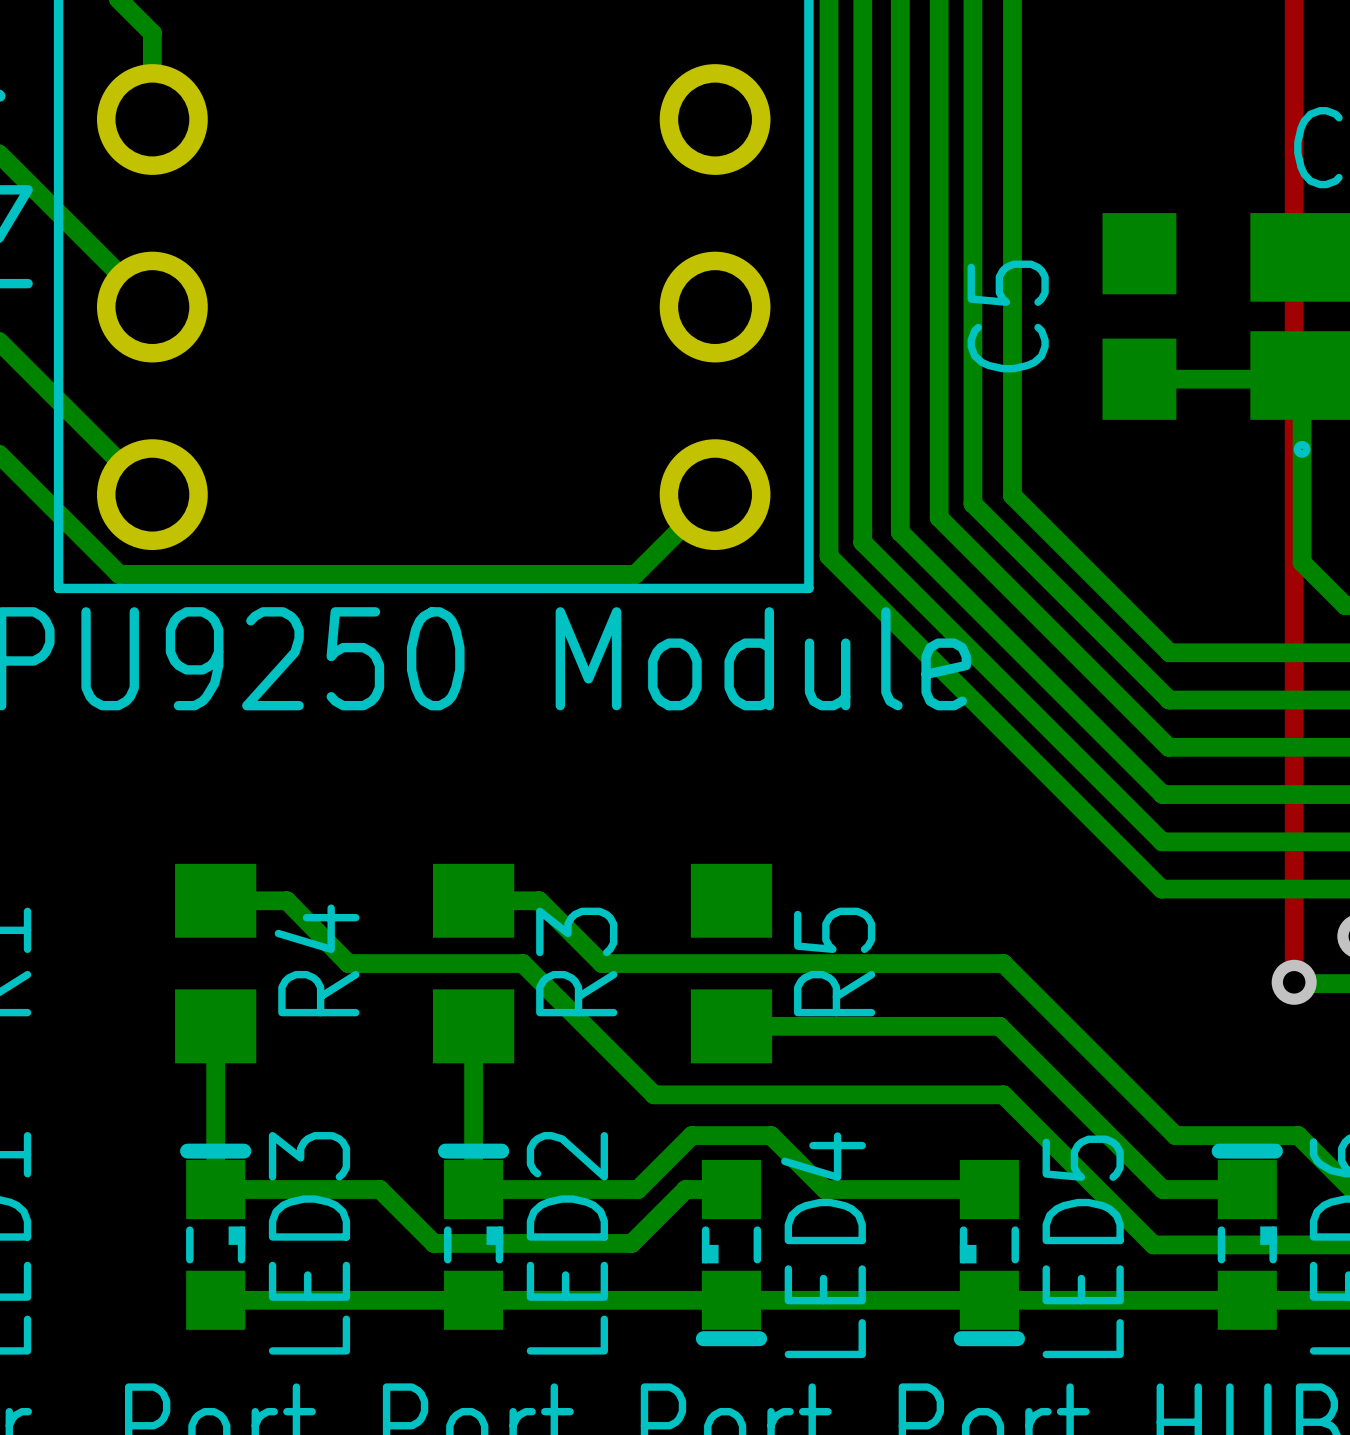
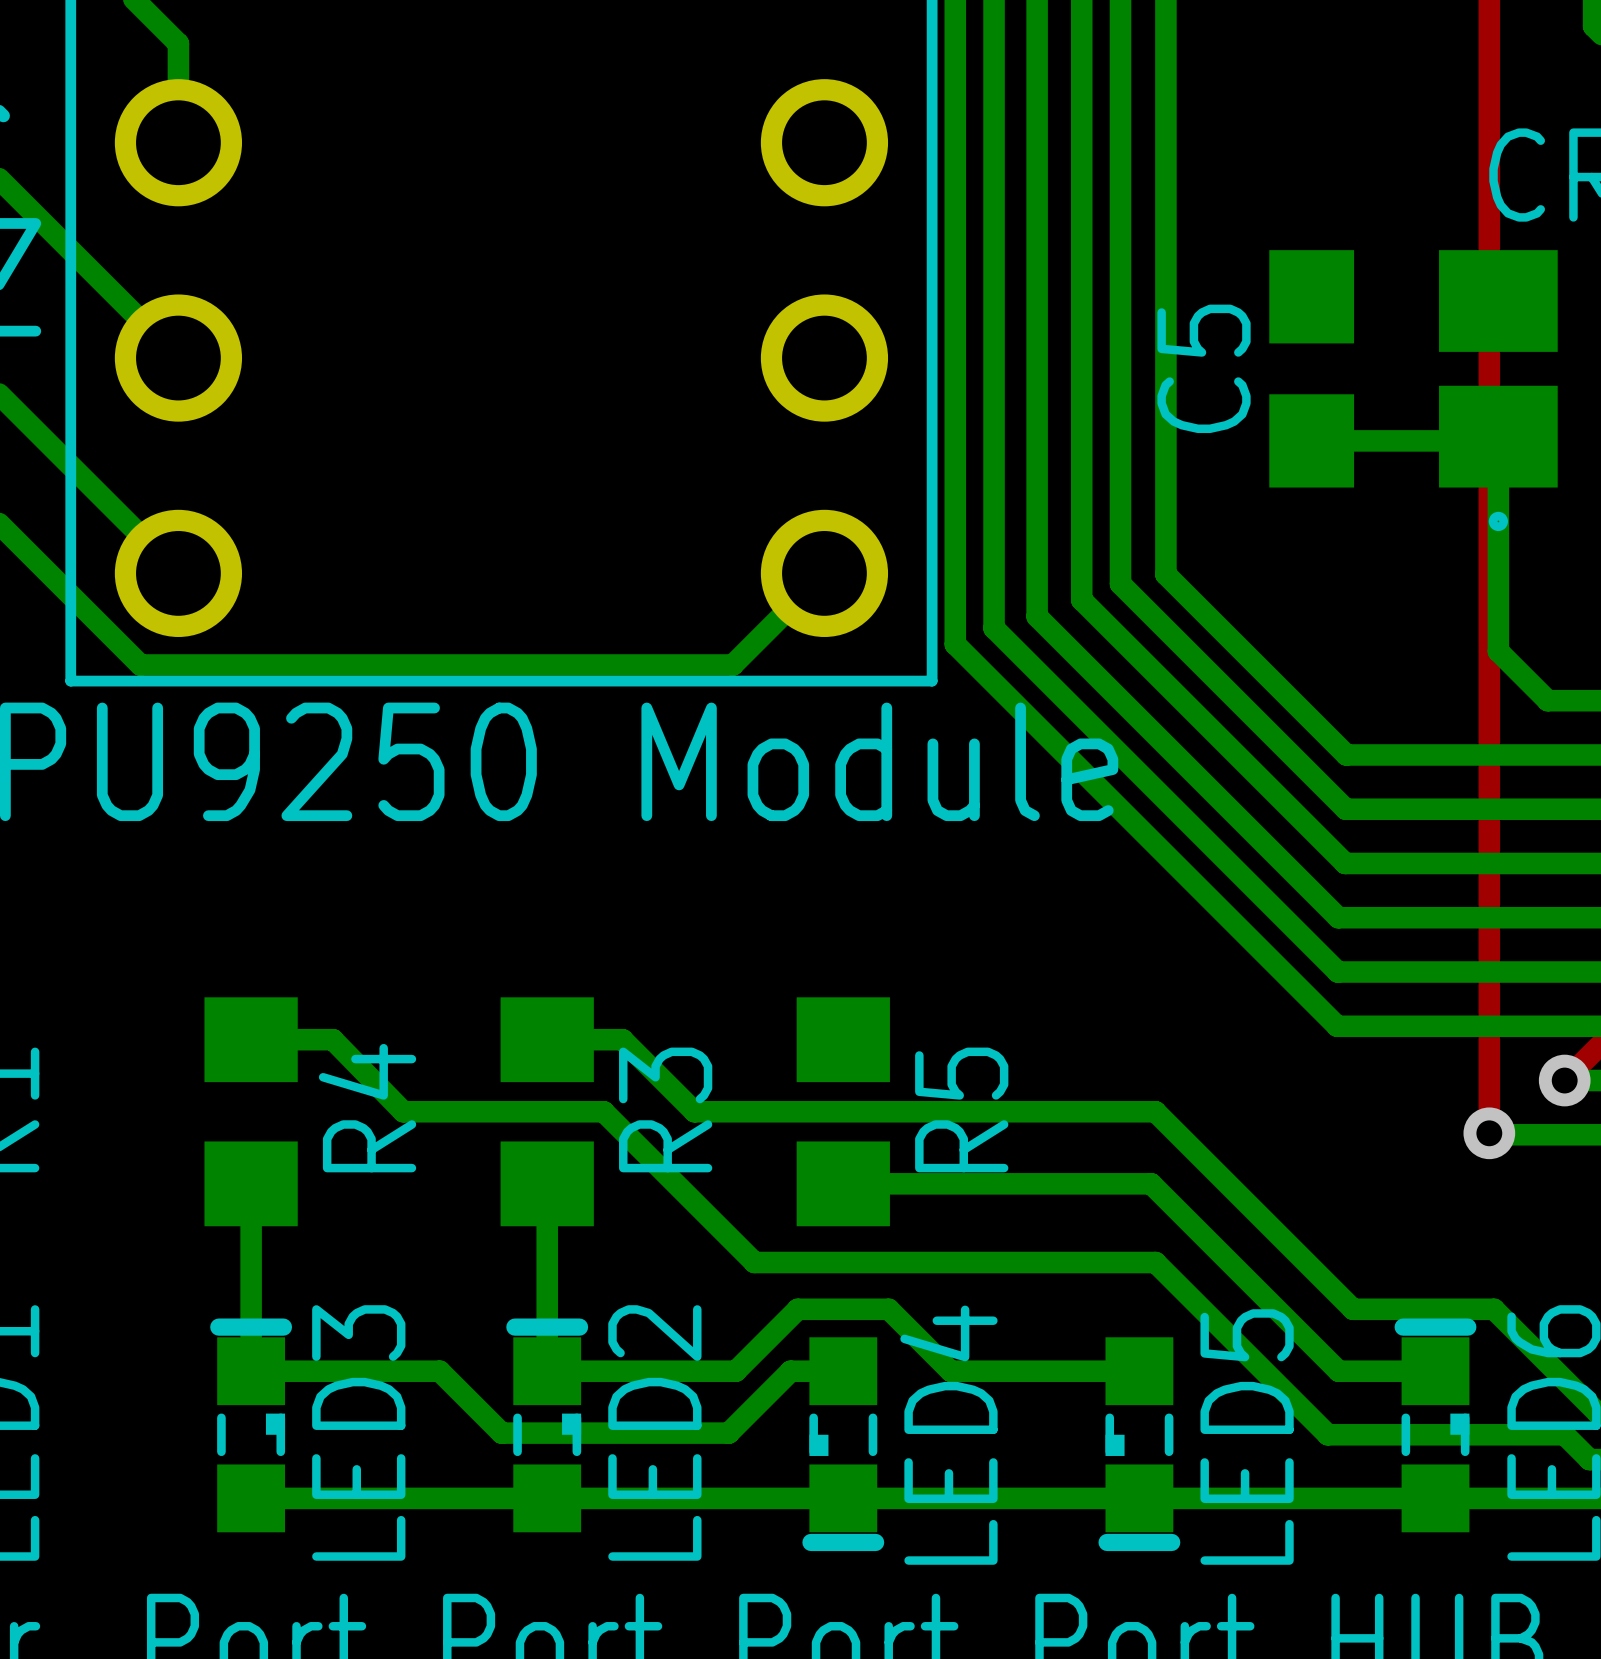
C5 name position: C5 (1008, 316) -> C5 (1204, 368)

